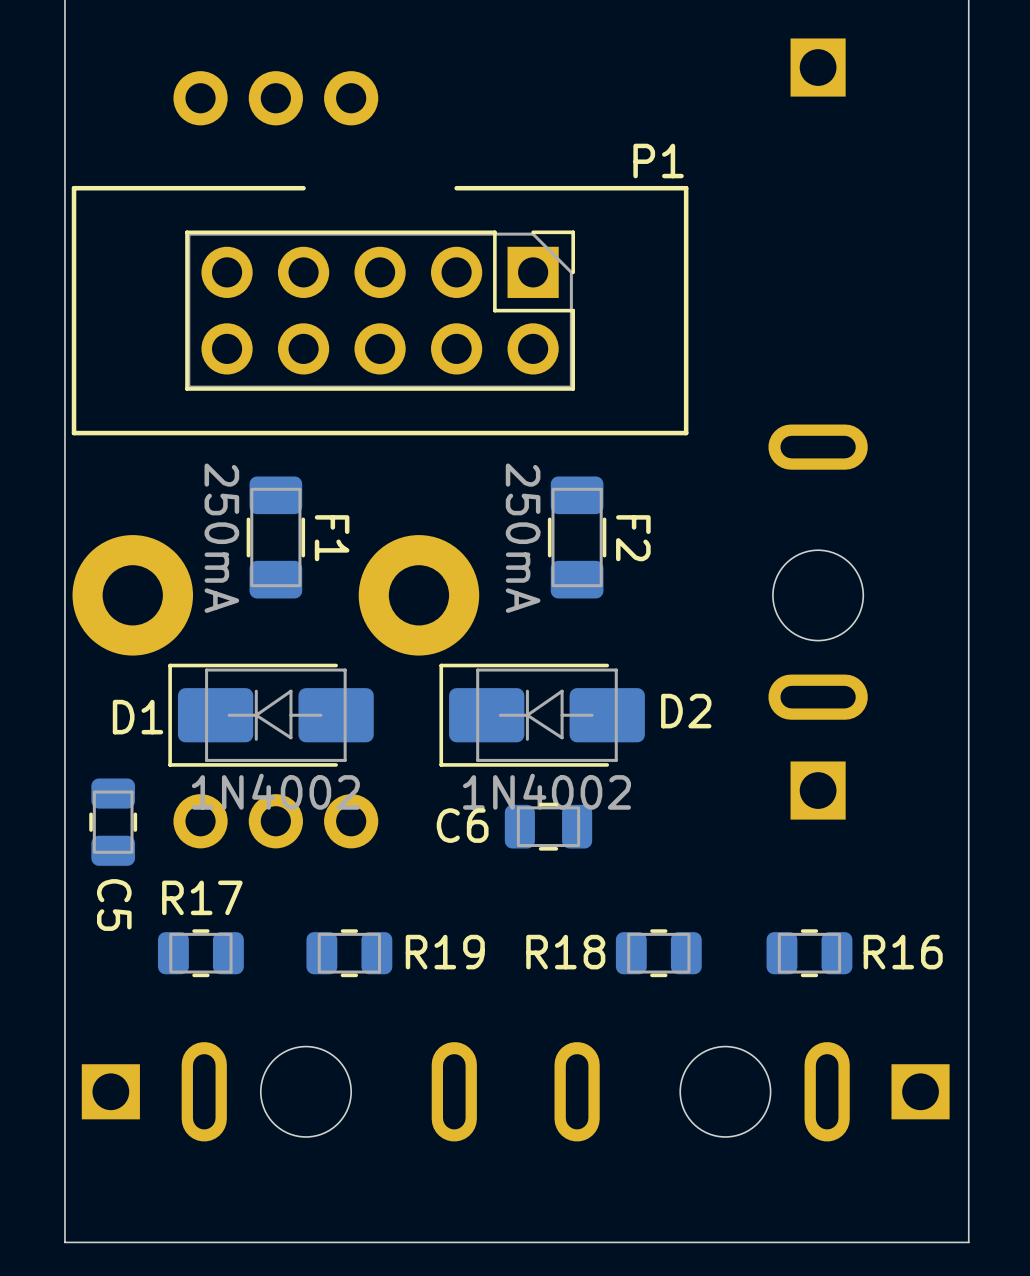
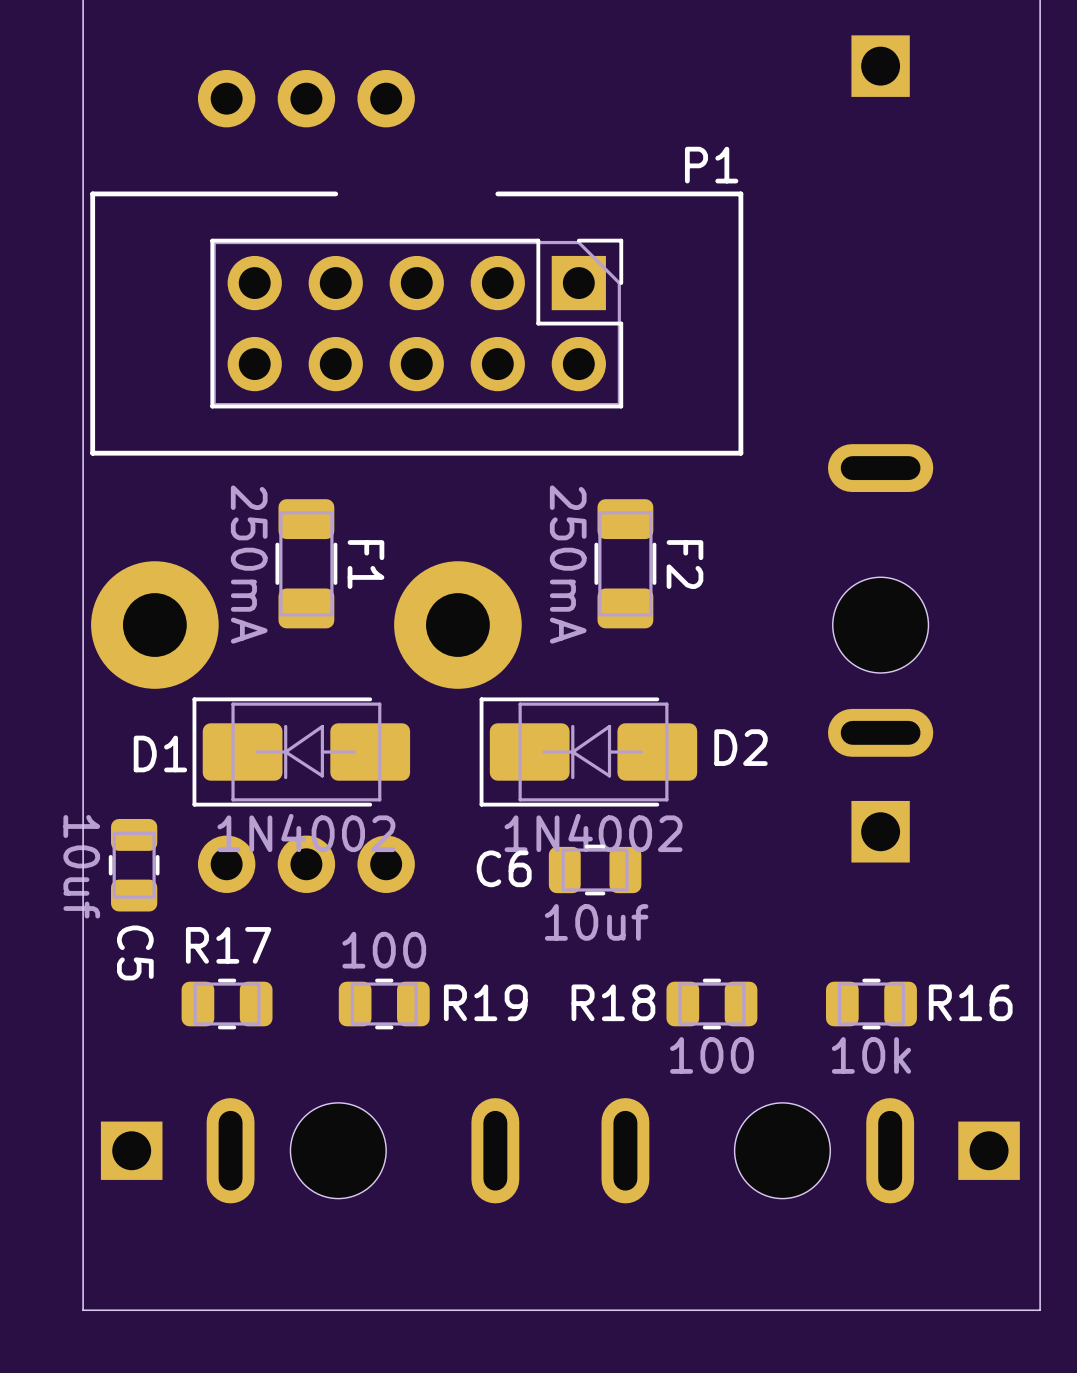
C5 value: none -> 10uf (81, 866)
C6 value: none -> 10uf (596, 922)
R19 value: none -> 100 (384, 950)
R18 value: none -> 100 (711, 1055)
R16 value: none -> 10k (871, 1055)

